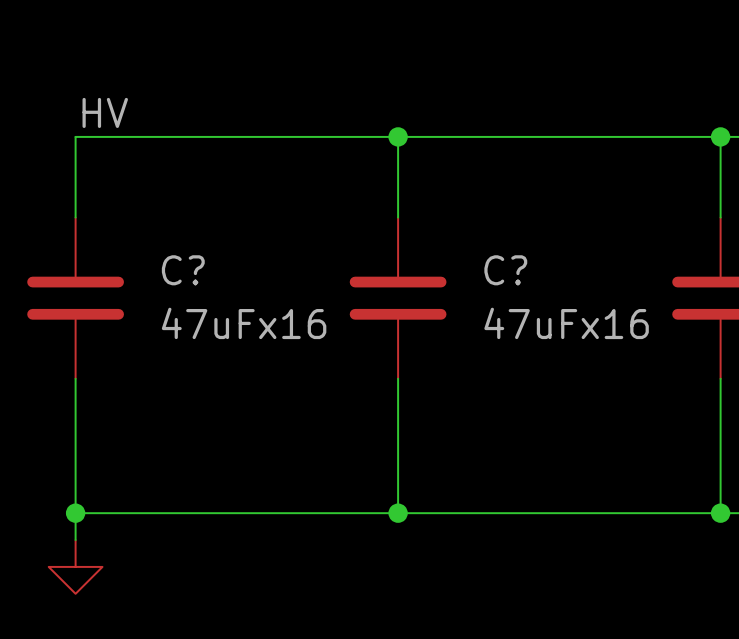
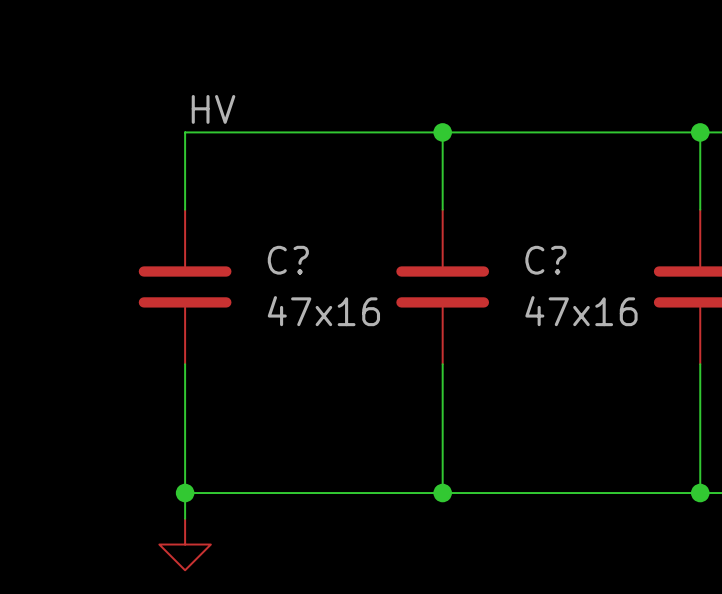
label position: HV (105, 112) -> HV (213, 109)
wire: (183, 136) (75, 136) (75, 217) -> (185, 132) (185, 209)
wire: (398, 136) (398, 217) -> (442, 132) (442, 209)
junction position: (398, 136) -> (442, 132)
C?: 47uFx16 (75, 298) -> none
C?: none -> 47x16 (185, 286)
C?: 47uFx16 (398, 298) -> none
C?: none -> 47x16 (442, 286)
wire: (75, 378) (75, 540) -> (185, 364) (185, 518)
wire: (398, 378) (398, 513) -> (442, 364) (442, 493)
wire: (75, 513) (183, 513) -> none
junction: (75, 513) -> none
junction: none -> (185, 493)
junction position: (398, 513) -> (442, 493)
power symbol position: (75, 566) -> (185, 544)

